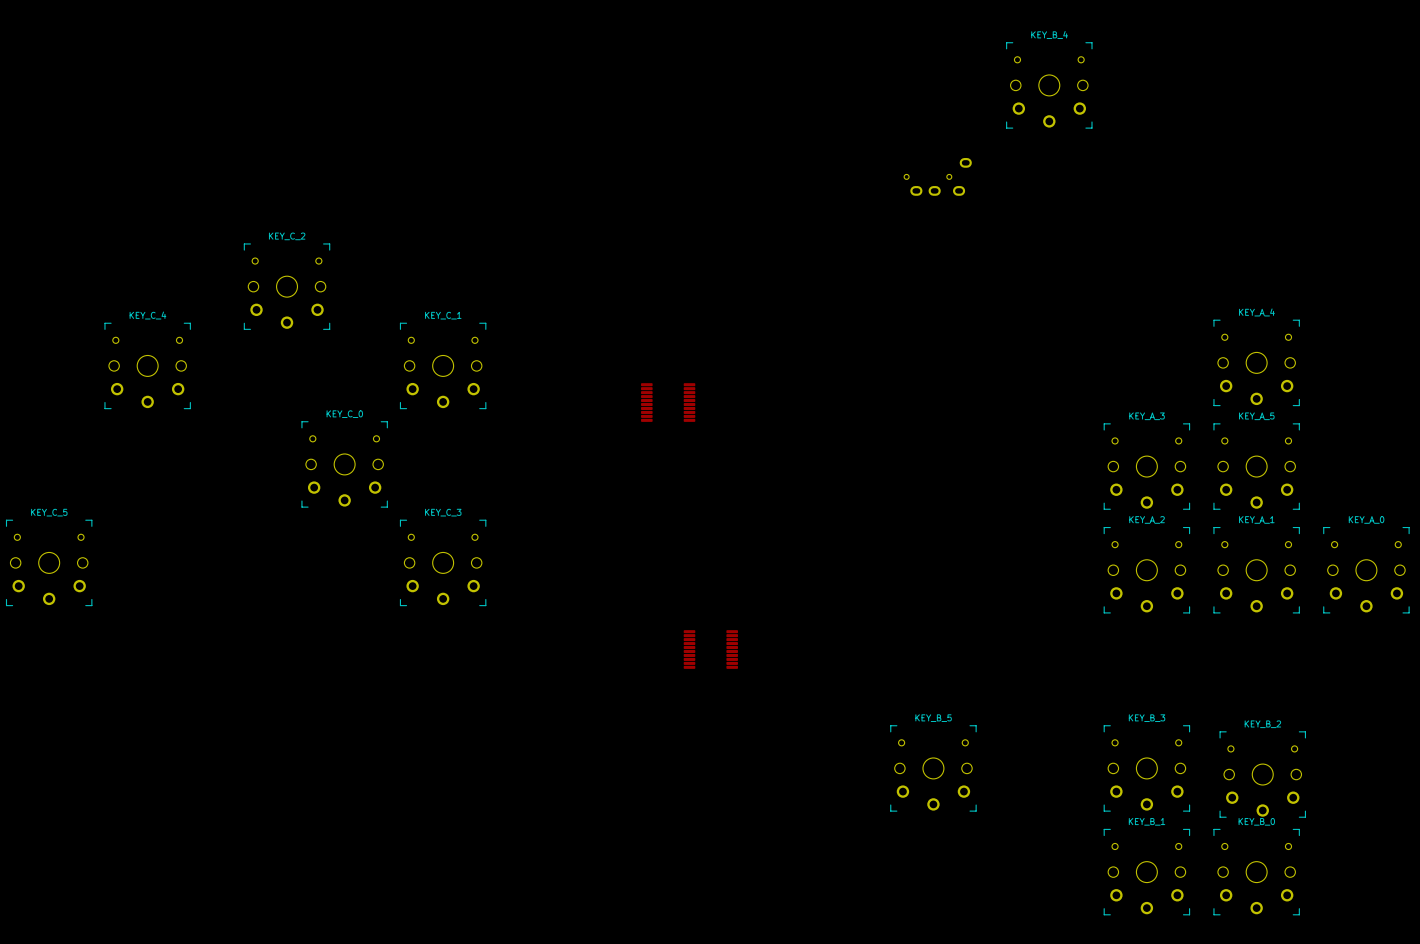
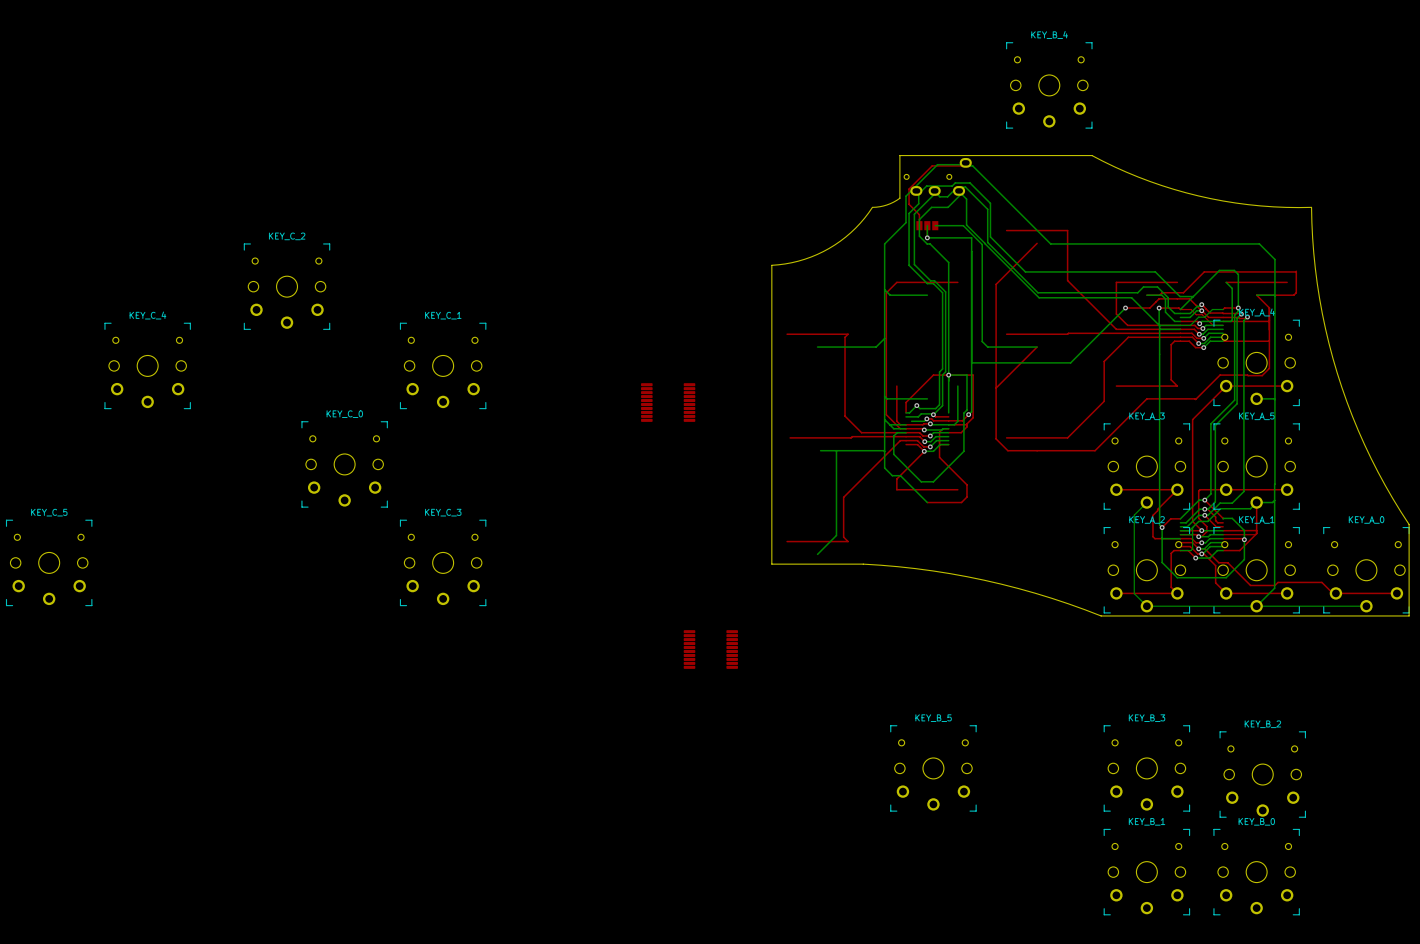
board edge: none -> (1092, 155) (899, 155) (899, 198) (886, 204) (872, 207) (850, 232) (823, 251) (798, 261) (771, 265) (771, 564) (863, 564) (950, 573) (1035, 593) (1101, 615) (1409, 615) (1409, 524) (1371, 458) (1352, 416) (1337, 373) (1325, 328) (1317, 283) (1311, 207) (1248, 204) (1198, 195) (1149, 181) (1092, 155)
top track: none -> (968, 165) (932, 165) (909, 189) (909, 204) (919, 214) (919, 225)
bottom track: none -> (927, 225) (927, 237) (971, 237) (971, 411) (968, 414)
part: none -> (927, 225)
bottom track: none -> (935, 225) (963, 225) (982, 244) (982, 341) (987, 347) (1037, 347)
top track: none -> (1006, 230) (1067, 230) (1067, 280) (1116, 329) (1194, 329) (1199, 334)
via: none -> (927, 237)
top track: none -> (1037, 243) (996, 284) (996, 438) (1007, 450) (1095, 450) (1146, 398) (1195, 399) (1220, 375) (1262, 375) (1269, 368) (1269, 307) (1256, 295) (1293, 295) (1296, 292) (1296, 271) (1204, 271) (1183, 292) (1146, 295)
top track: none -> (957, 282) (896, 282) (886, 292) (886, 414) (900, 428) (924, 429)
top track: none -> (1177, 282) (1116, 282) (1116, 314) (1127, 325) (1194, 325) (1197, 328) (1202, 328)
bottom track: none -> (1226, 282) (1232, 288) (1232, 320) (1201, 321) (1199, 323)
top track: none -> (1287, 282) (1226, 282)
bottom track: none -> (884, 289) (890, 295) (927, 295)
bottom track: none -> (1146, 295) (1161, 295) (1165, 298) (1165, 312) (1174, 321) (1180, 321)
bottom track: none -> (1256, 295) (1274, 295)
bottom track: none -> (1193, 296) (1179, 296) (1155, 271) (1025, 271) (990, 236) (990, 203) (970, 182) (955, 182) (952, 186) (926, 186) (918, 193) (918, 203) (909, 213) (909, 265) (927, 283) (933, 283) (942, 292) (942, 368) (939, 372) (939, 404) (935, 408) (919, 408) (916, 405) (909, 412) (906, 412)
top track: none -> (1201, 304) (1210, 313) (1241, 314)
bottom track: none -> (1201, 304) (1190, 313) (1174, 313) (1168, 307) (1168, 297) (1157, 287) (1143, 287) (1137, 292) (1037, 292) (987, 242) (987, 209) (965, 187) (957, 187) (947, 196) (939, 196) (934, 193) (914, 214) (914, 264) (930, 280) (934, 280) (945, 291) (945, 371) (942, 374) (942, 405) (933, 414) (921, 413) (918, 416) (906, 416)
via: none -> (1201, 304)
top track: none -> (1125, 308) (1149, 308) (1159, 298) (1189, 298) (1208, 317) (1245, 318) (1247, 317)
bottom track: none -> (1125, 308) (1070, 362) (971, 362)
via: none -> (1125, 308)
top track: none -> (1159, 308) (1191, 309) (1196, 314) (1202, 314) (1213, 325) (1223, 325)
bottom track: none -> (1159, 308) (1159, 325)
via: none -> (1159, 308)
top track: none -> (1238, 308) (1223, 309)
via: none -> (1238, 308)
bottom track: none -> (1180, 309) (1219, 270) (1234, 270) (1238, 274) (1238, 311) (1234, 315) (1234, 400) (1210, 423) (1210, 494) (1204, 500) (1199, 500) (1180, 518)
bottom track: none -> (1223, 309) (1212, 309) (1204, 317) (1198, 317) (1190, 325) (1159, 325)
bottom track: none -> (1201, 310) (1196, 310) (1190, 317) (1180, 317)
via: none -> (1201, 310)
bottom track: none -> (1241, 314) (1237, 318) (1237, 403) (1215, 425) (1215, 501) (1208, 509) (1199, 509) (1186, 522) (1180, 522)
via: none -> (1241, 314)
bottom track: none -> (1247, 317) (1243, 320) (1243, 491) (1232, 503) (1220, 503) (1207, 515) (1204, 515)
via: none -> (1247, 317)
top track: none -> (1269, 320) (1223, 321)
top track: none -> (1180, 321) (1197, 321) (1199, 323)
via: none -> (1199, 323)
bottom track: none -> (1159, 325) (1131, 297) (1039, 297) (966, 225) (966, 199) (961, 193) (948, 207) (931, 207) (919, 219) (919, 236) (948, 262) (948, 412)
bottom track: none -> (1159, 325) (1159, 525) (1162, 527) (1162, 562) (1177, 577) (1226, 577) (1244, 559) (1244, 530) (1232, 518) (1223, 518)
bottom track: none -> (1223, 325) (1206, 325) (1202, 328)
bottom track: none -> (1159, 328) (1180, 329)
via: none -> (1202, 328)
bottom track: none -> (1223, 329) (1207, 329) (1202, 334) (1199, 334)
bottom track: none -> (1223, 333) (1208, 333) (1203, 338)
top track: none -> (787, 334) (848, 334) (845, 337) (845, 416) (861, 432) (919, 432) (922, 436) (930, 436)
top track: none -> (1006, 334) (1191, 333) (1197, 338) (1203, 338)
via: none -> (1199, 334)
bottom track: none -> (1223, 337) (1210, 337) (1204, 343) (1198, 343)
bottom track: none -> (884, 338) (876, 347) (817, 347)
via: none -> (1203, 338)
bottom track: none -> (1223, 341) (1210, 341) (1203, 347)
top track: none -> (1269, 341) (1223, 341)
top track: none -> (1198, 343) (1192, 337) (1128, 337) (1104, 361) (1104, 401) (1067, 437) (1006, 437)
via: none -> (1198, 343)
top track: none -> (1037, 347) (996, 388)
top track: none -> (1203, 347) (1195, 347) (1189, 341) (1174, 341) (1171, 344) (1171, 379) (1177, 386) (1116, 386)
via: none -> (1203, 347)
bottom track: none -> (948, 375) (966, 375) (966, 410) (963, 413) (963, 451) (933, 481) (921, 481) (893, 454) (893, 436) (897, 432) (906, 432)
via: none -> (948, 375)
top track: none -> (896, 386) (896, 421) (900, 424) (930, 423)
bottom track: none -> (957, 386) (957, 421) (954, 424) (930, 423)
top track: none -> (1287, 386) (1226, 386) (1192, 419) (1192, 521) (1201, 530) (1180, 530)
bottom track: none -> (884, 396) (887, 398) (927, 398)
bottom track: none -> (1256, 398) (1274, 399)
via: none -> (916, 405)
top track: none -> (906, 412) (906, 402) (933, 375) (973, 375) (973, 417) (961, 432) (948, 432)
top track: none -> (933, 414) (935, 416) (948, 416)
via: none -> (933, 414)
top track: none -> (968, 414) (962, 420) (933, 420) (926, 418)
via: none -> (968, 414)
bottom track: none -> (926, 418) (924, 421) (911, 421)
via: none -> (926, 418)
bottom track: none -> (884, 419) (893, 428) (906, 428)
via: none -> (930, 423)
bottom track: none -> (906, 424) (889, 424)
top track: none -> (966, 424) (948, 424)
top track: none -> (948, 428) (943, 428) (939, 432) (939, 457) (966, 484) (966, 497) (961, 502) (927, 502)
bottom track: none -> (948, 428) (924, 429)
via: none -> (924, 429)
bottom track: none -> (948, 432) (933, 432) (930, 436)
via: none -> (930, 436)
bottom track: none -> (948, 436) (935, 436) (930, 441) (924, 441)
top track: none -> (790, 437) (919, 436) (924, 441)
bottom track: none -> (948, 440) (936, 440) (930, 446)
via: none -> (924, 441)
top track: none -> (906, 444) (917, 444) (924, 451) (896, 479) (896, 489) (957, 489)
bottom track: none -> (948, 444) (940, 444) (933, 451) (924, 451)
top track: none -> (930, 446) (923, 446) (917, 440) (900, 440) (843, 497) (843, 537) (848, 541) (787, 541)
via: none -> (930, 446)
bottom track: none -> (820, 450) (884, 451)
bottom track: none -> (836, 450) (836, 535) (817, 554)
via: none -> (924, 451)
top track: none -> (1116, 489) (1177, 489) (1152, 515) (1152, 536) (1154, 538) (1191, 538) (1196, 542) (1201, 542)
top track: none -> (1287, 489) (1199, 489) (1198, 518) (1206, 526) (1206, 531) (1201, 536) (1196, 534) (1180, 534)
top track: none -> (1204, 500) (1223, 518)
via: none -> (1204, 500)
bottom track: none -> (1274, 500) (1272, 502) (1256, 502) (1250, 508) (1220, 508) (1207, 521) (1198, 521) (1189, 530) (1180, 530)
bottom track: none -> (927, 502) (900, 475) (892, 475) (884, 467) (884, 243) (906, 222) (906, 196) (937, 164) (972, 165) (1050, 243) (1259, 243) (1274, 259) (1274, 588) (1256, 606)
bottom track: none -> (1146, 502) (1134, 515) (1134, 593) (1146, 606) (1366, 606)
top track: none -> (1256, 502) (1256, 533)
top track: none -> (1204, 509) (1207, 509) (1215, 517) (1217, 522) (1223, 522)
via: none -> (1204, 509)
bottom track: none -> (1202, 515) (1198, 515) (1187, 526) (1180, 526)
top track: none -> (1204, 515) (1216, 526) (1223, 526)
via: none -> (1204, 515)
top track: none -> (1180, 518) (1170, 518) (1162, 527)
via: none -> (1162, 527)
bottom track: none -> (1192, 527) (1192, 548) (1180, 550)
bottom track: none -> (1201, 530) (1223, 530)
via: none -> (1201, 530)
top track: none -> (1256, 530) (1223, 530)
bottom track: none -> (1192, 533) (1180, 534)
top track: none -> (1256, 533) (1239, 550) (1223, 550)
top track: none -> (1256, 533) (1223, 534)
bottom track: none -> (1223, 534) (1198, 536)
via: none -> (1198, 536)
bottom track: none -> (1180, 538) (1162, 538)
top track: none -> (1223, 538) (1244, 539)
bottom track: none -> (1223, 538) (1209, 538) (1205, 542) (1201, 542)
via: none -> (1244, 539)
top track: none -> (1180, 542) (1192, 542) (1198, 548) (1204, 548) (1218, 562) (1227, 562) (1250, 585) (1274, 585) (1278, 582) (1321, 582) (1332, 593) (1393, 593)
via: none -> (1201, 542)
bottom track: none -> (1223, 542) (1210, 542) (1204, 548) (1198, 548)
top track: none -> (1180, 546) (1190, 546) (1197, 553) (1203, 553) (1215, 565) (1215, 582) (1226, 593) (1287, 593)
bottom track: none -> (1223, 546) (1210, 546) (1201, 553)
via: none -> (1198, 548)
bottom track: none -> (1223, 550) (1217, 550) (1209, 558) (1195, 558)
via: none -> (1201, 553)
top track: none -> (1195, 558) (1188, 550) (1174, 550) (1171, 553) (1171, 587) (1177, 593) (1116, 593)
via: none -> (1195, 558)

